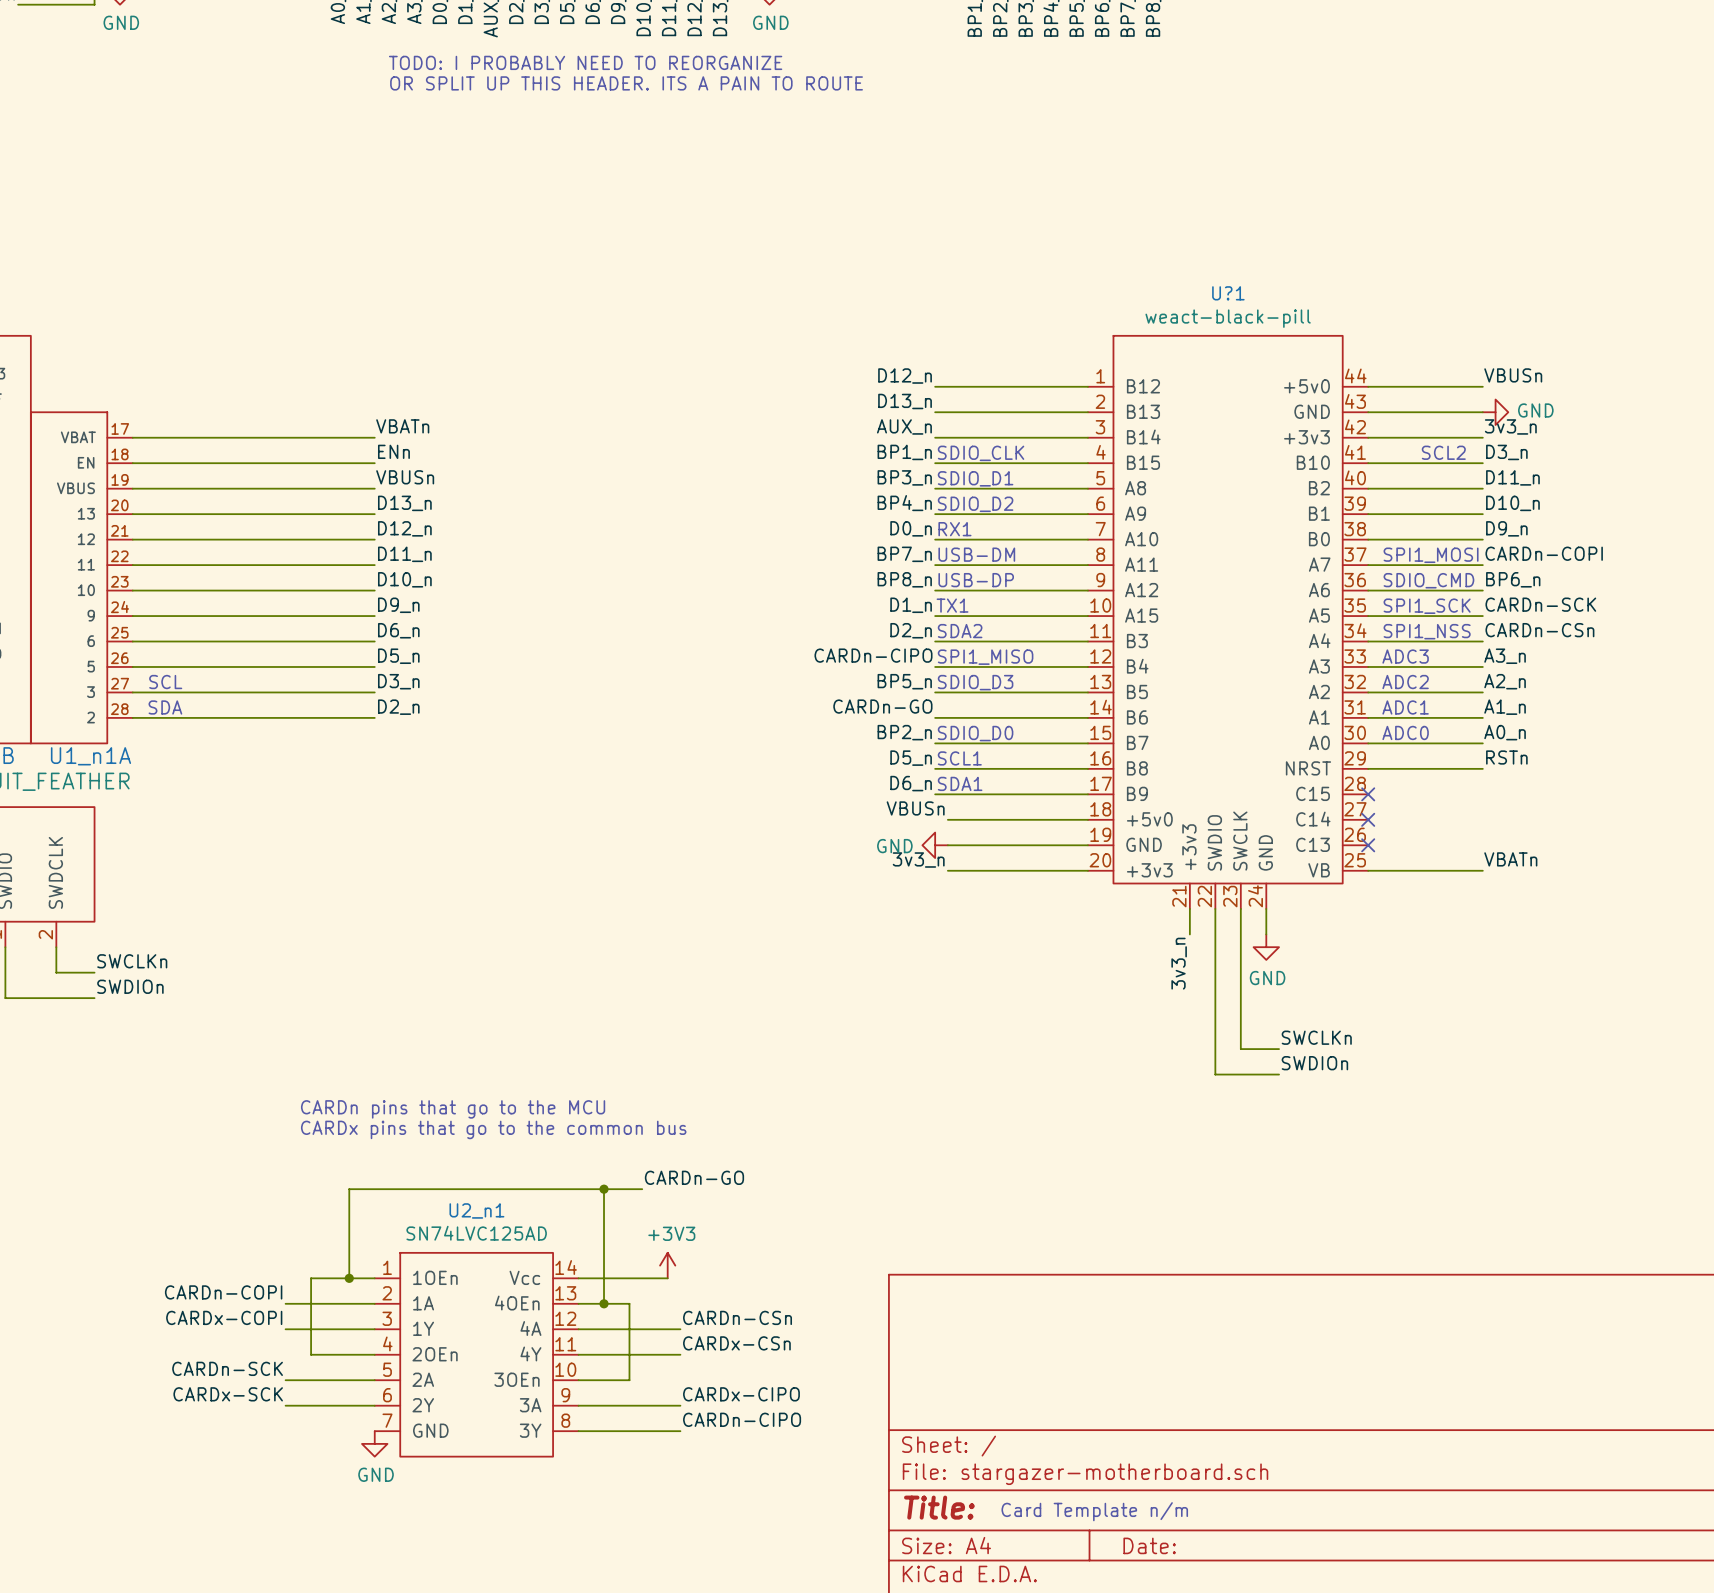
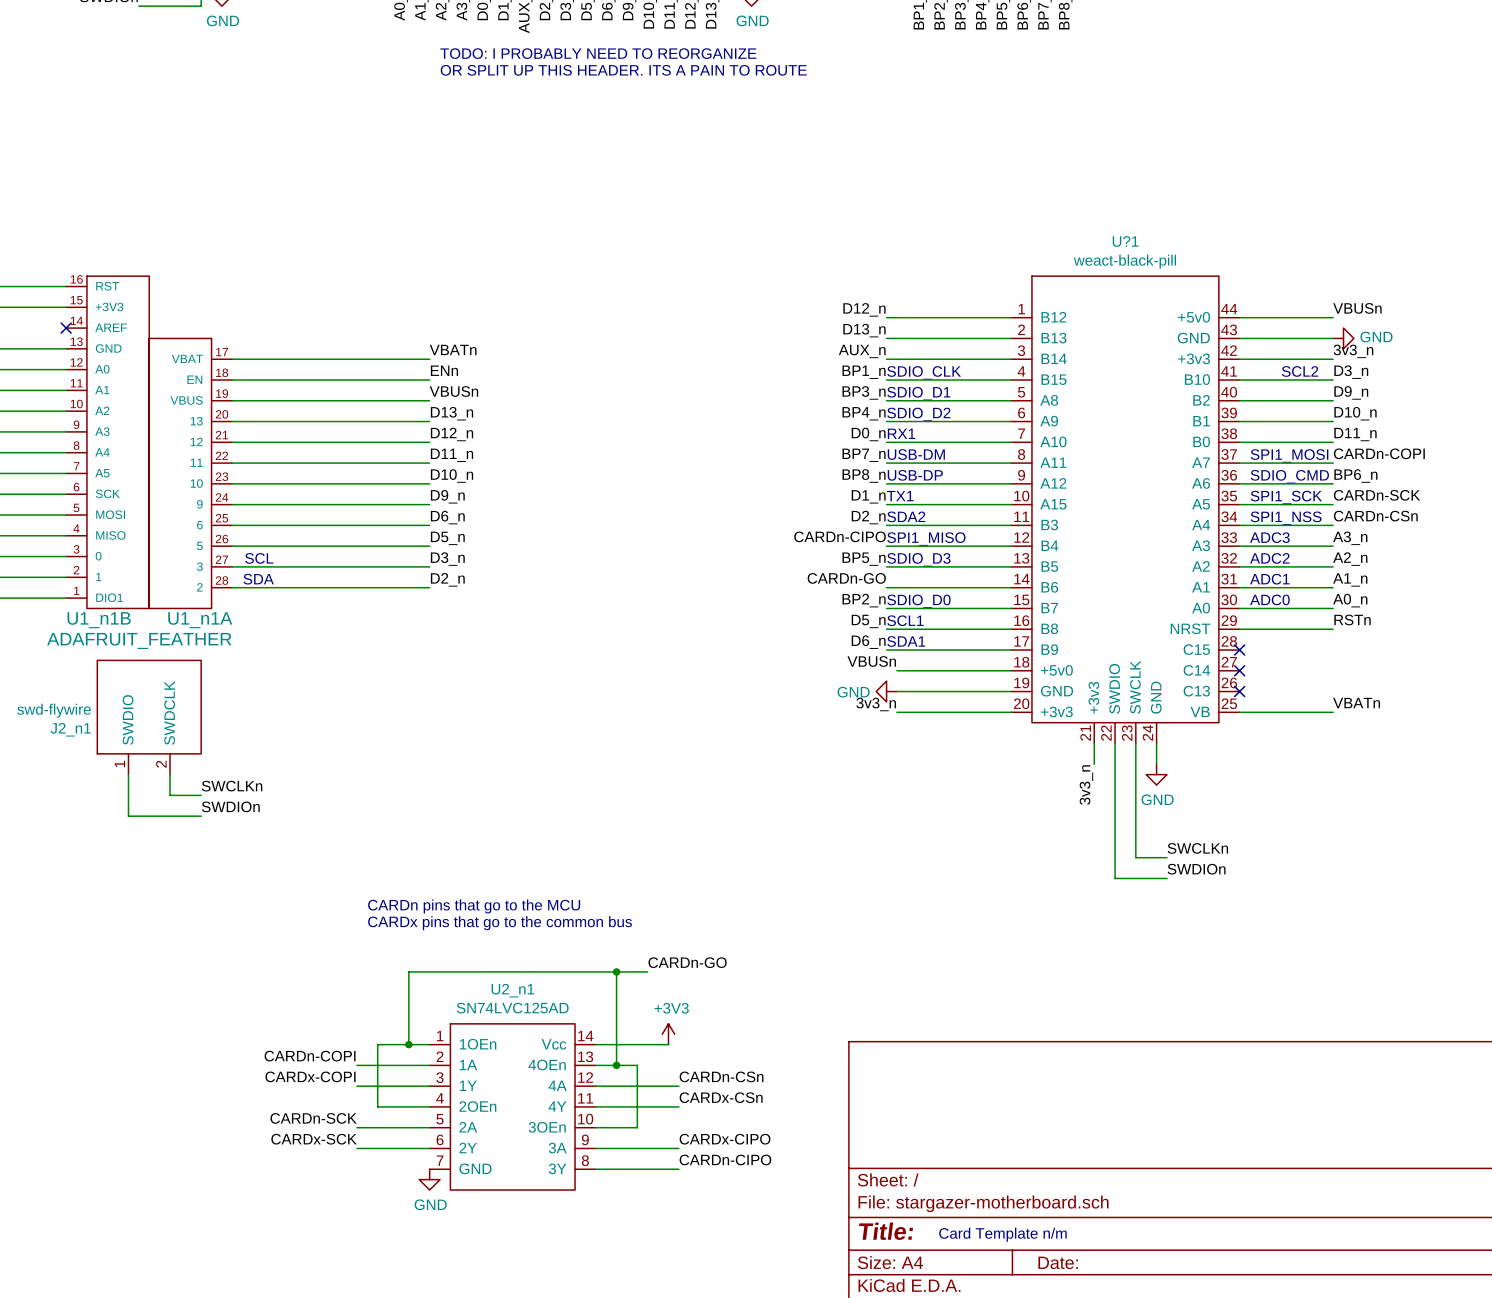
label: D11_n (1512, 477) -> D9_n (1351, 392)
label: D9_n (1506, 528) -> D11_n (1355, 434)

